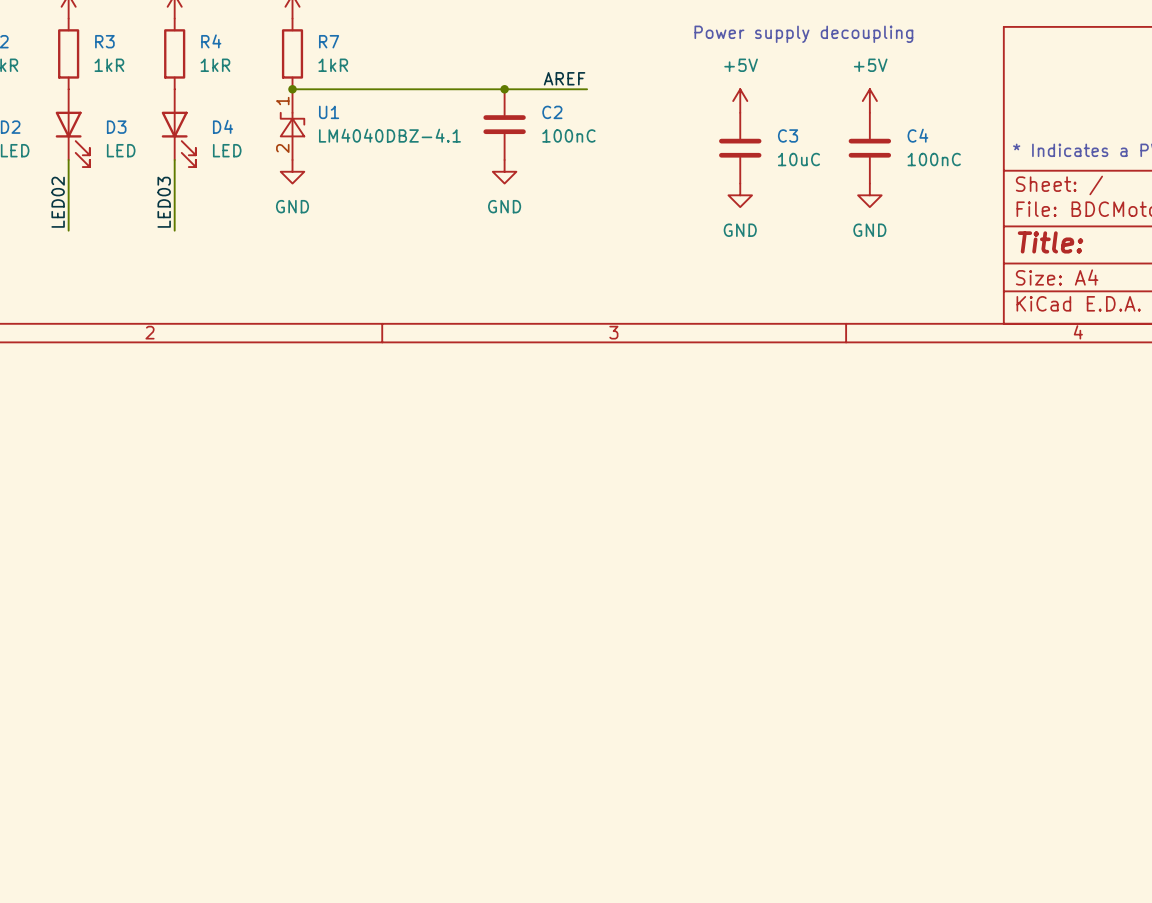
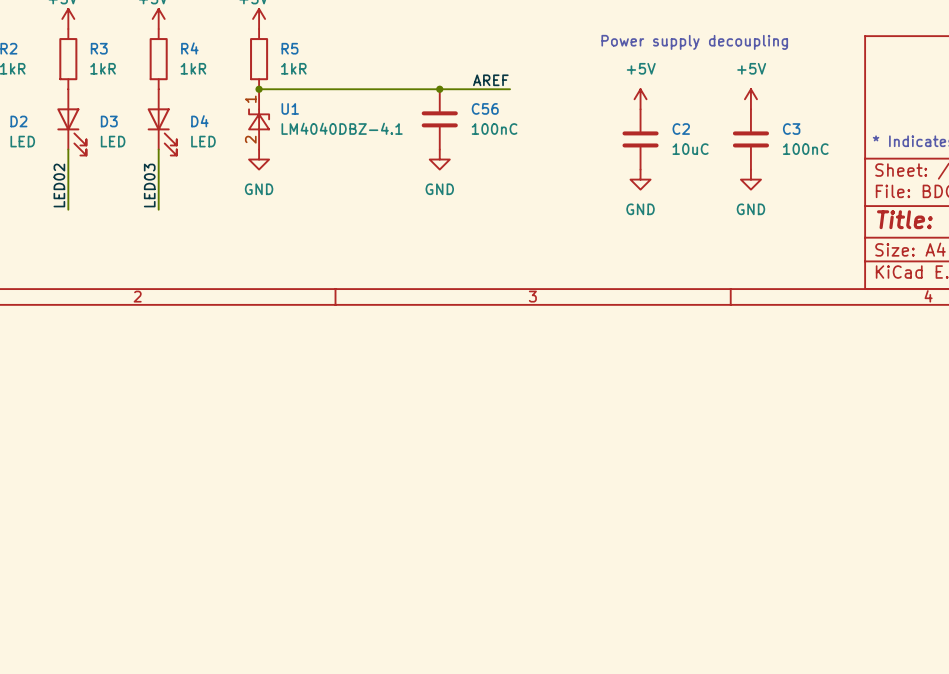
R7 name: R7 (329, 41) -> R5 (289, 48)
C2 name: C2 (552, 112) -> C56 (485, 108)
C3 name: C3 (788, 135) -> C2 (681, 129)
C4 name: C4 (917, 135) -> C3 (791, 129)

